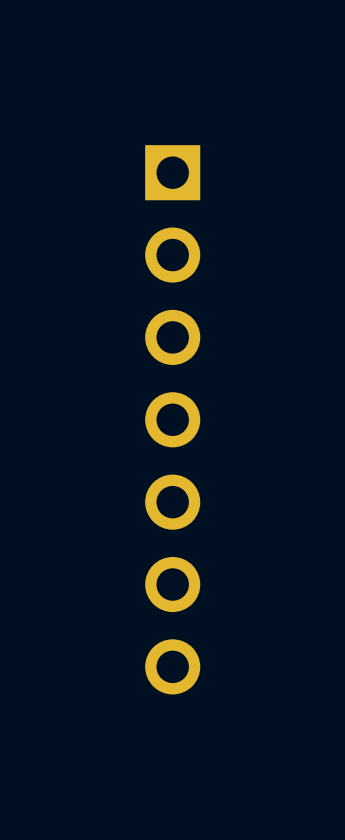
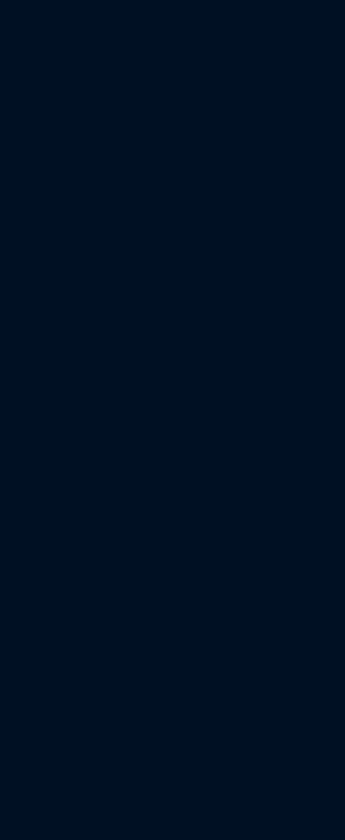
part: (172, 419) -> none

